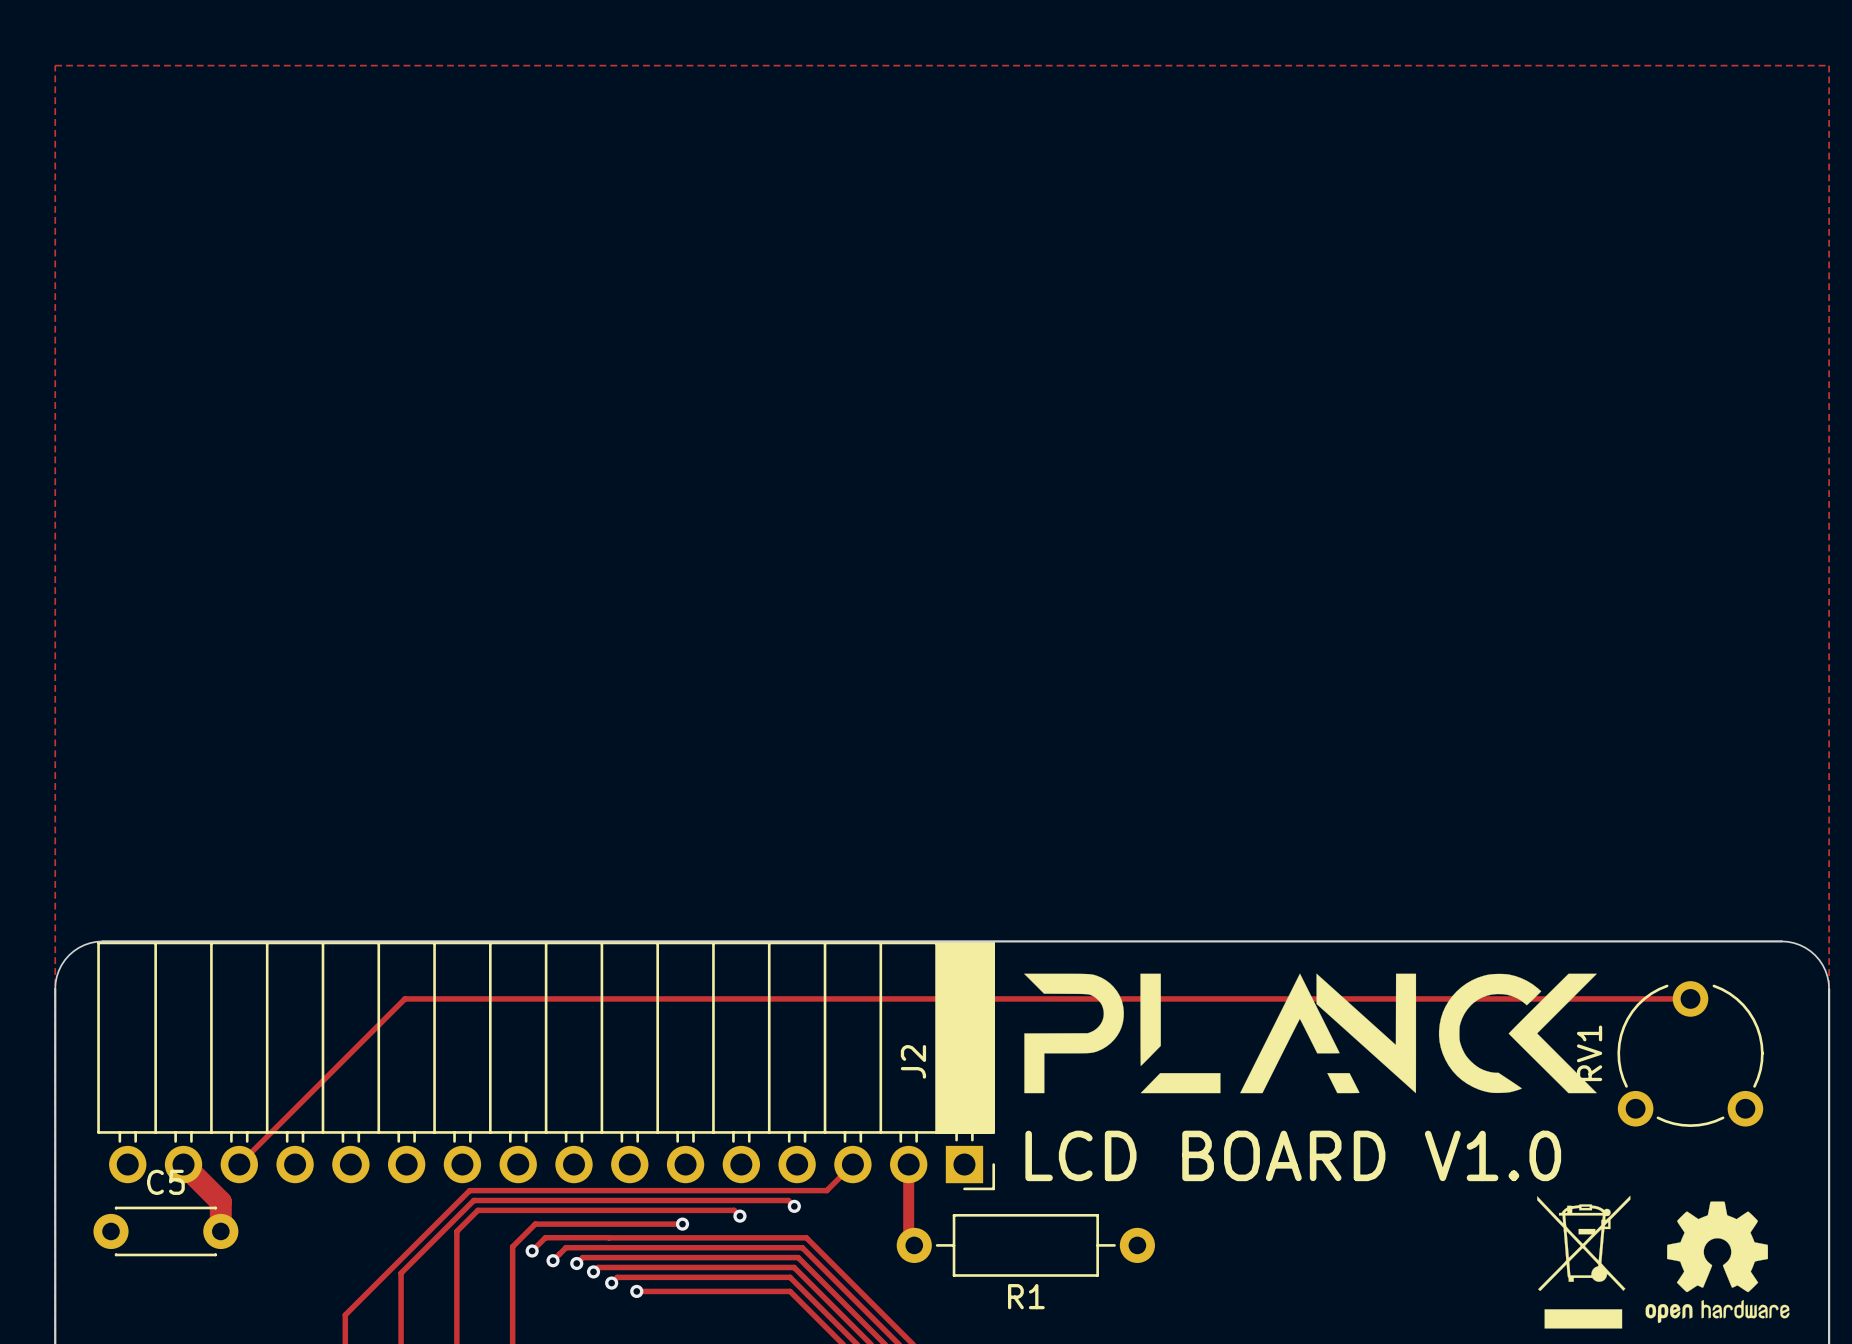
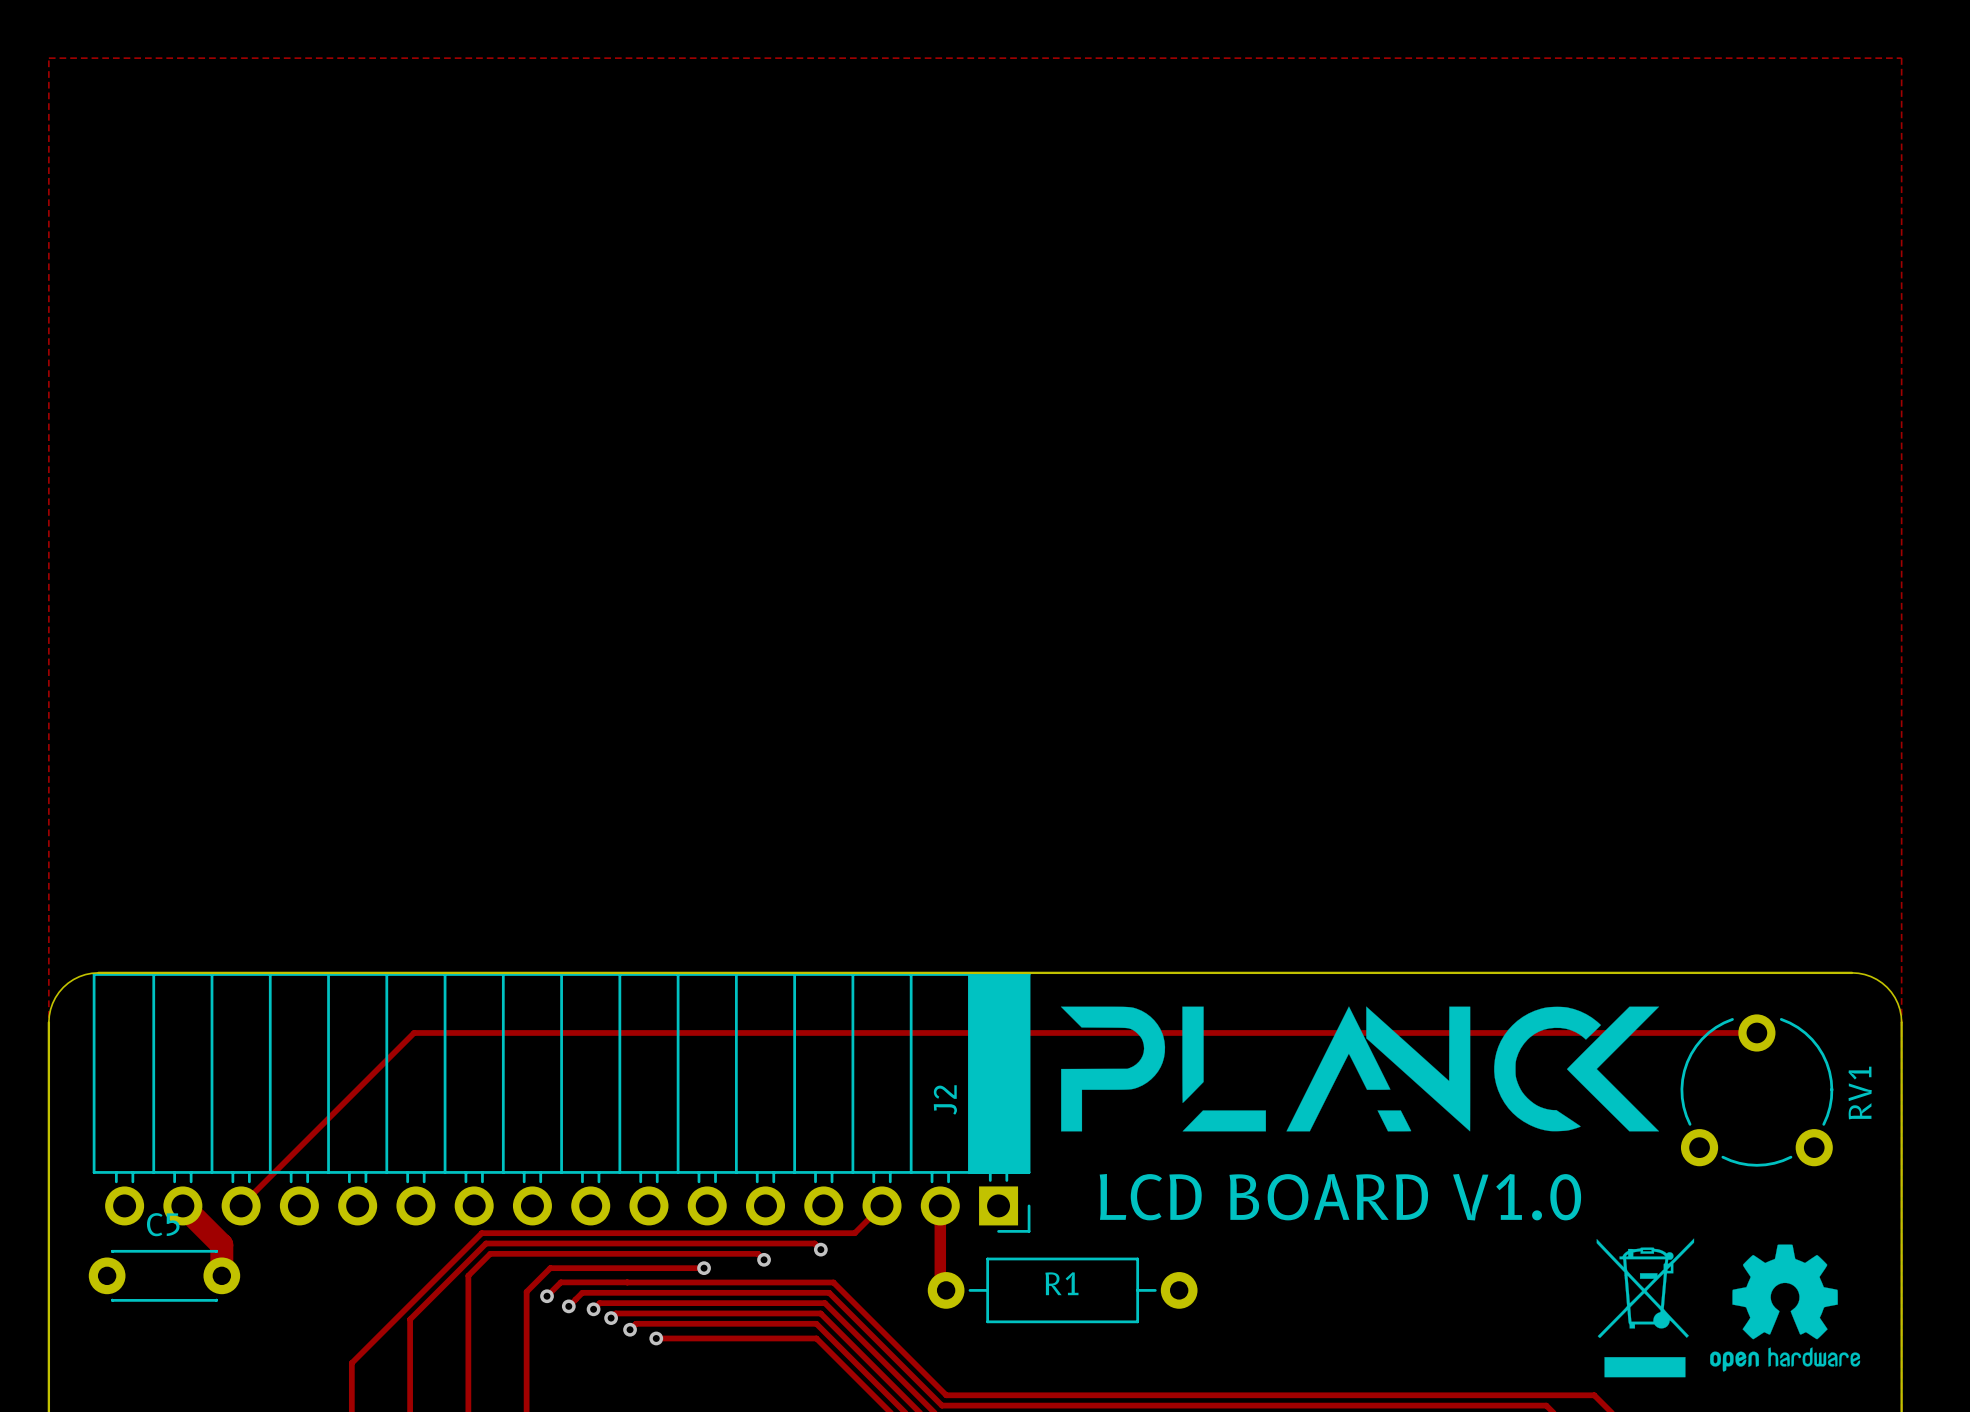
RV1 name position: RV1 (1589, 1053) -> RV1 (1860, 1093)
R1 name position: R1 (1026, 1296) -> R1 (1061, 1283)

